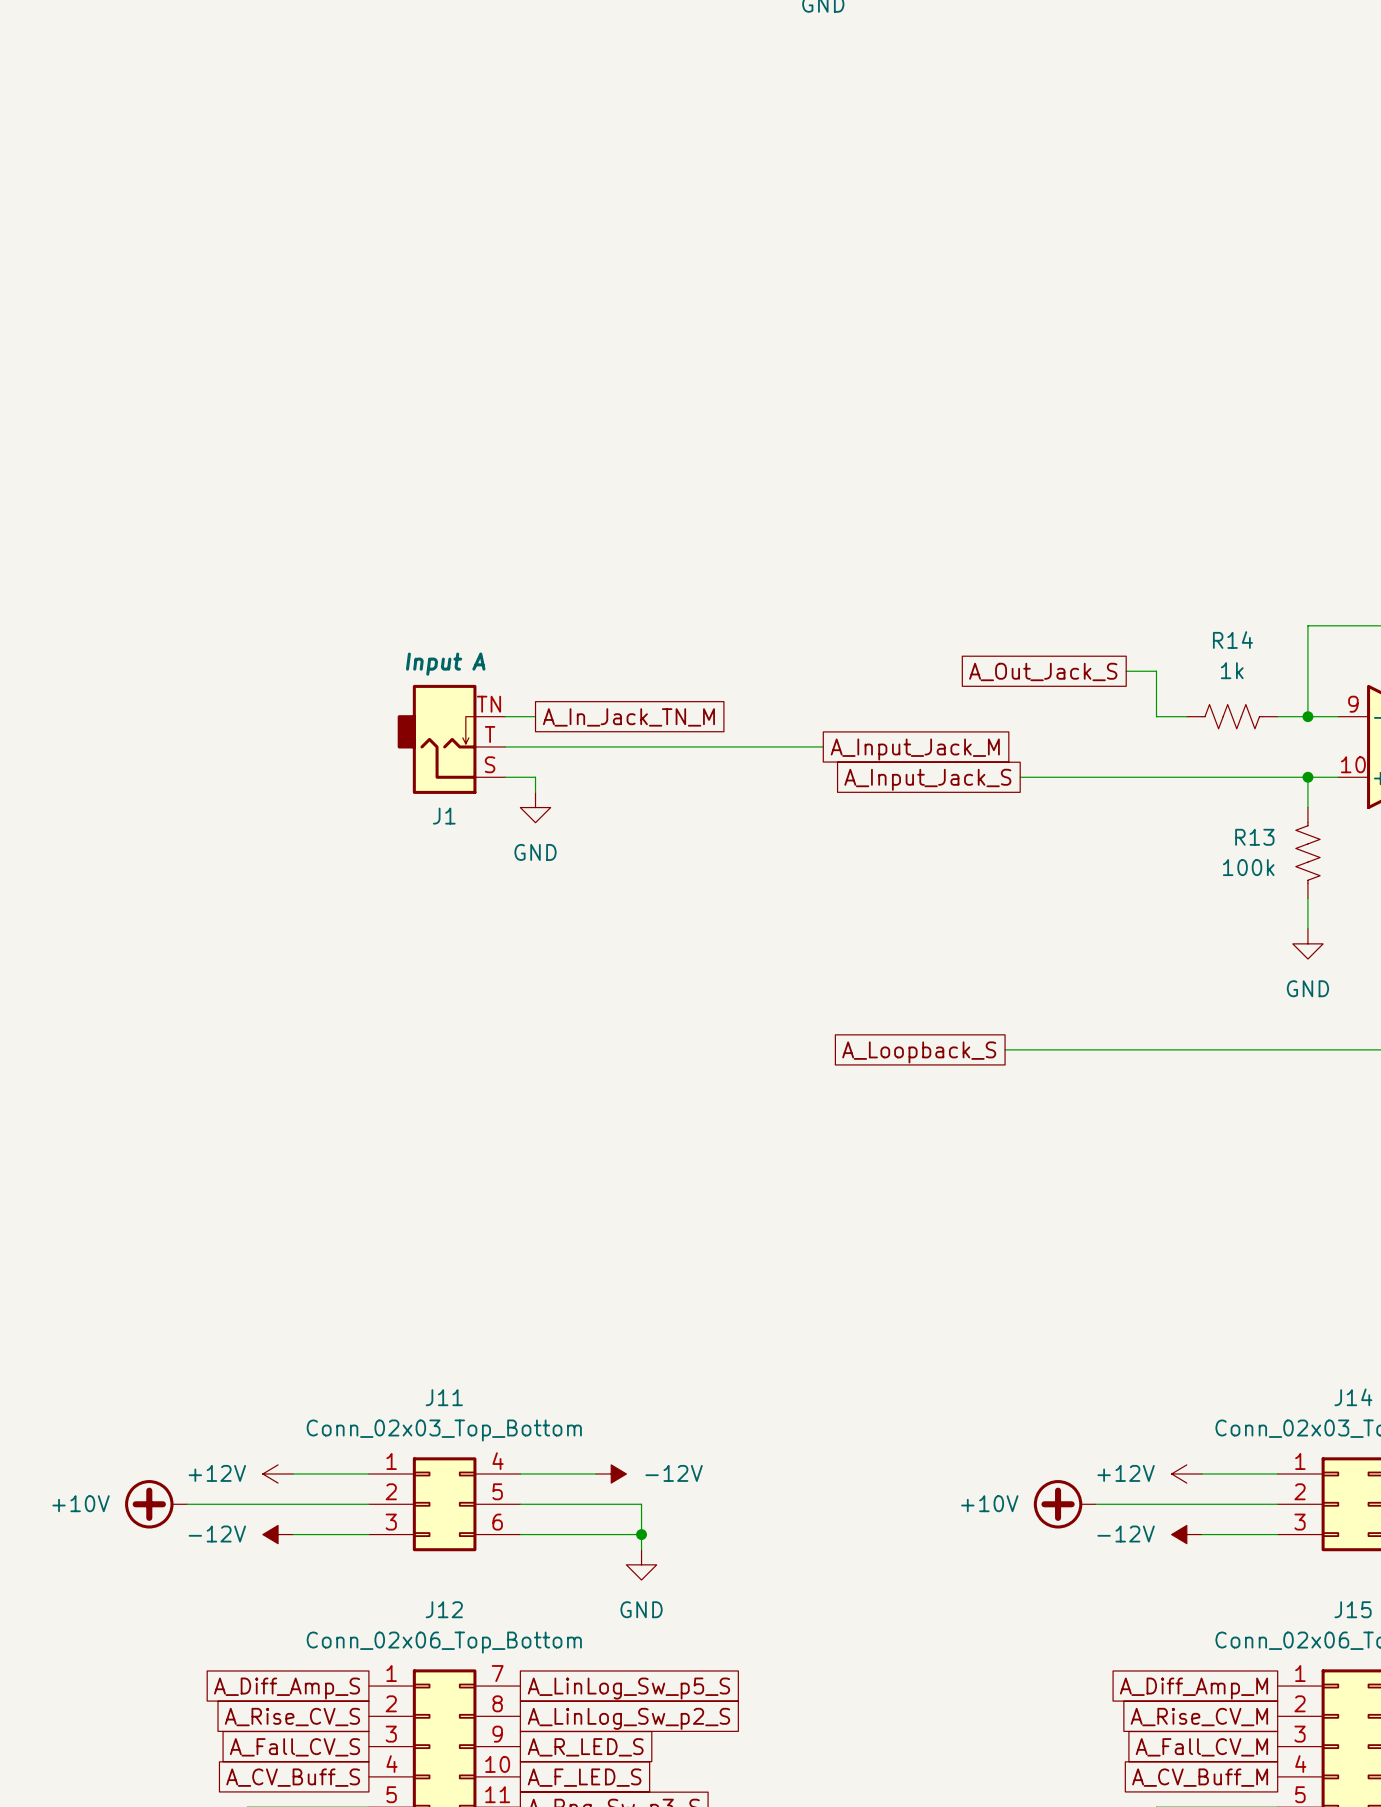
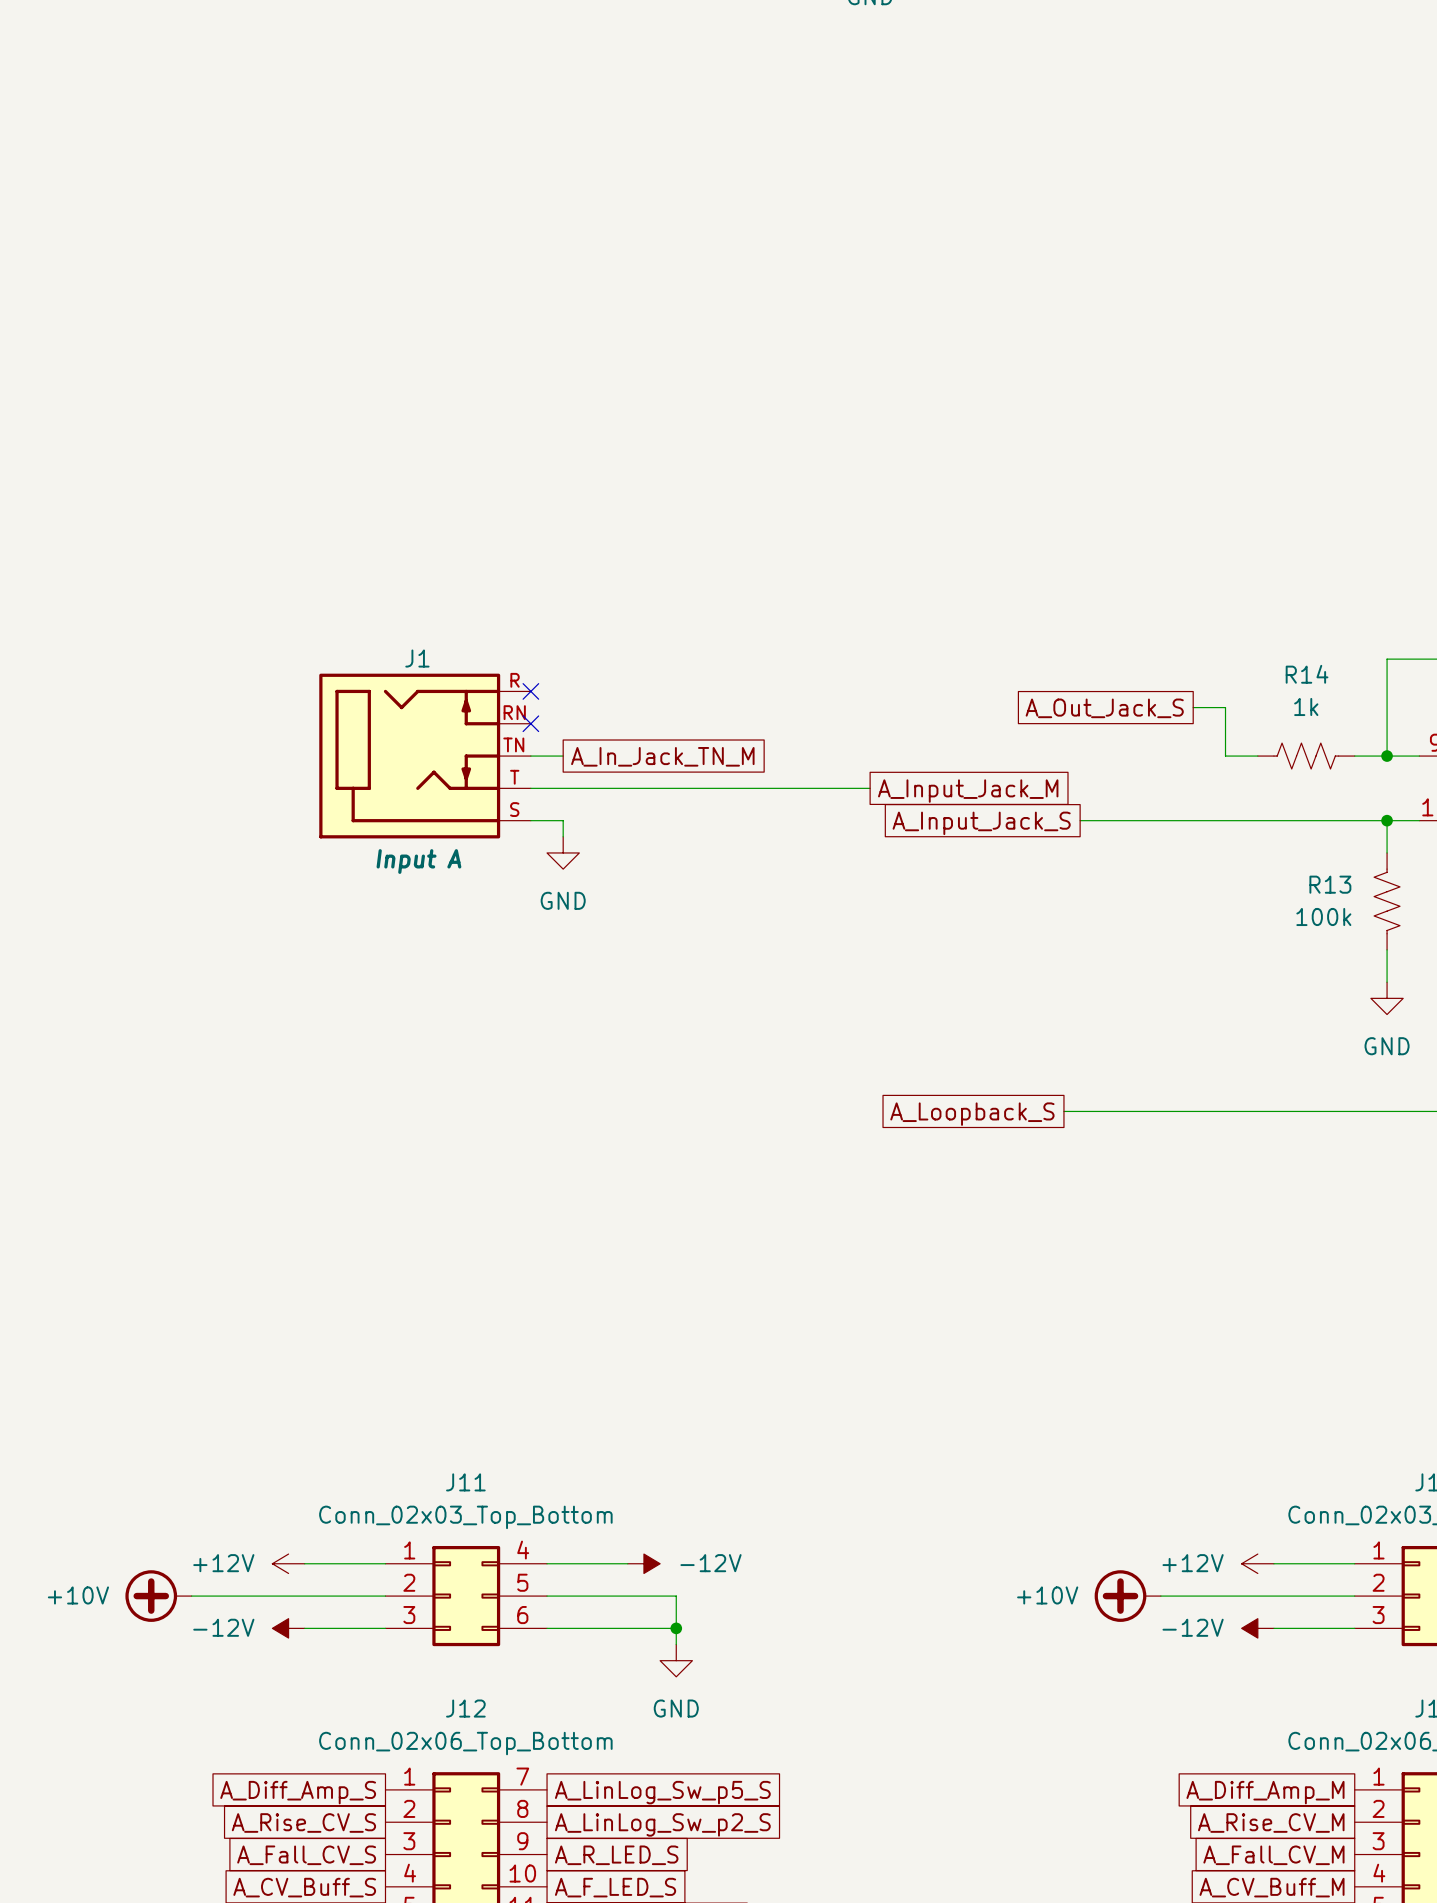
no-connect mark: none -> (530, 691)
J1 text position: Input A (445, 664) -> Input A (418, 861)
J1 symbol: [397, 684, 506, 794] -> [319, 673, 531, 839]
no-connect mark: none -> (530, 723)
J1 name position: J1 (444, 816) -> J1 (417, 658)

